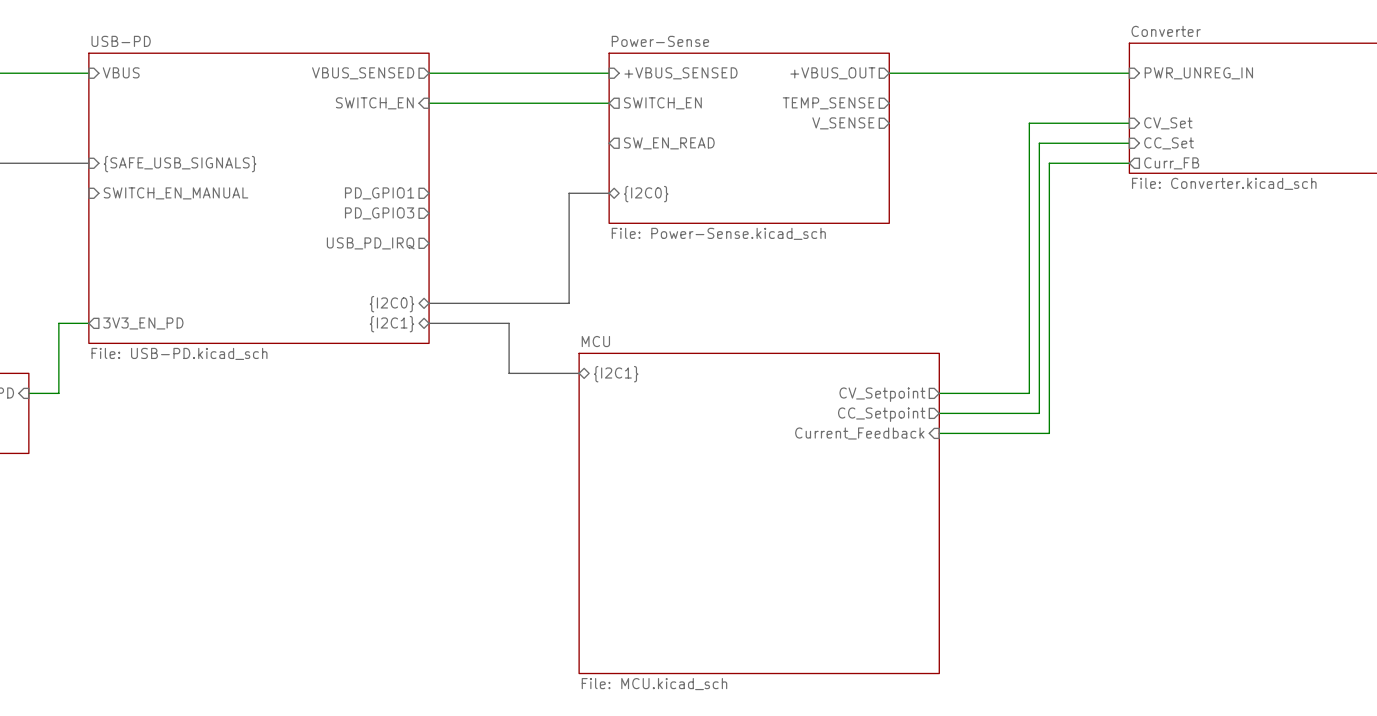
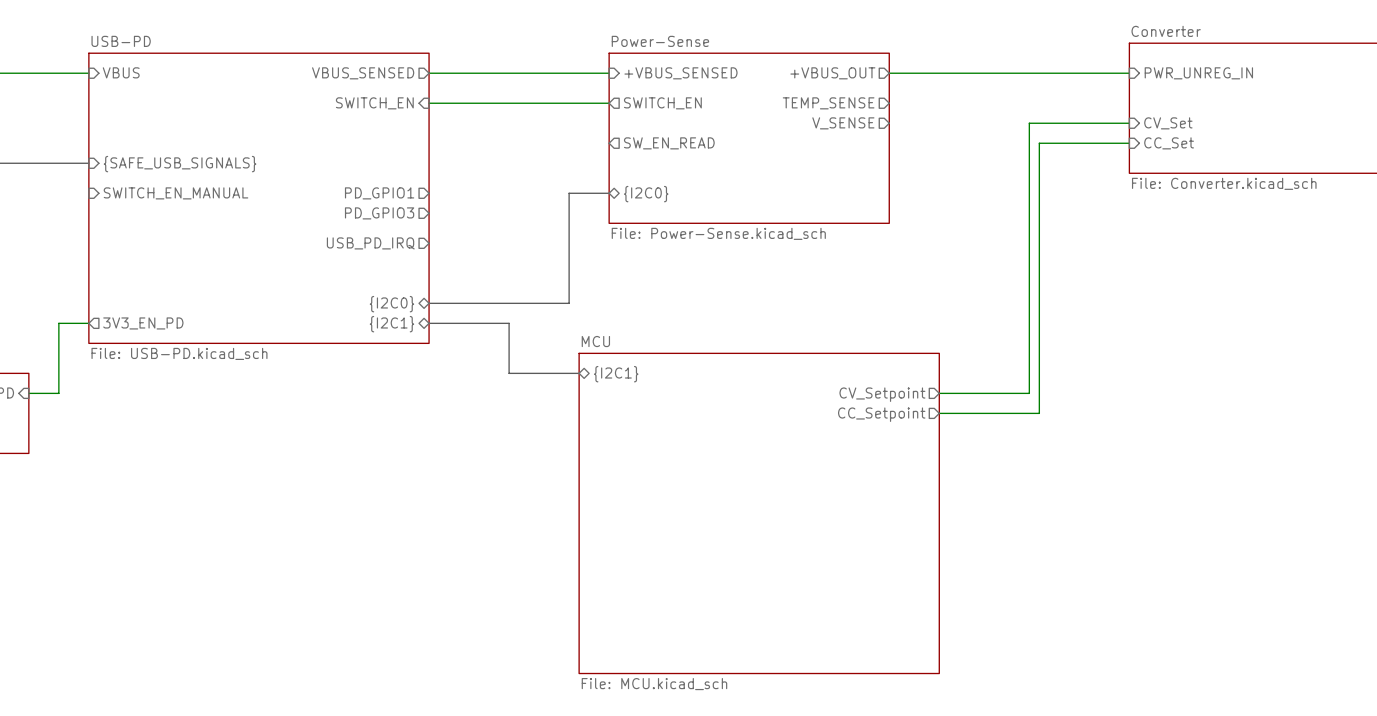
wire: (1129, 163) (1049, 163) (1049, 433) (939, 433) -> none
sheet pin: Curr_FB (1171, 163) -> none
sheet pin: Current_Feedback (859, 433) -> none

